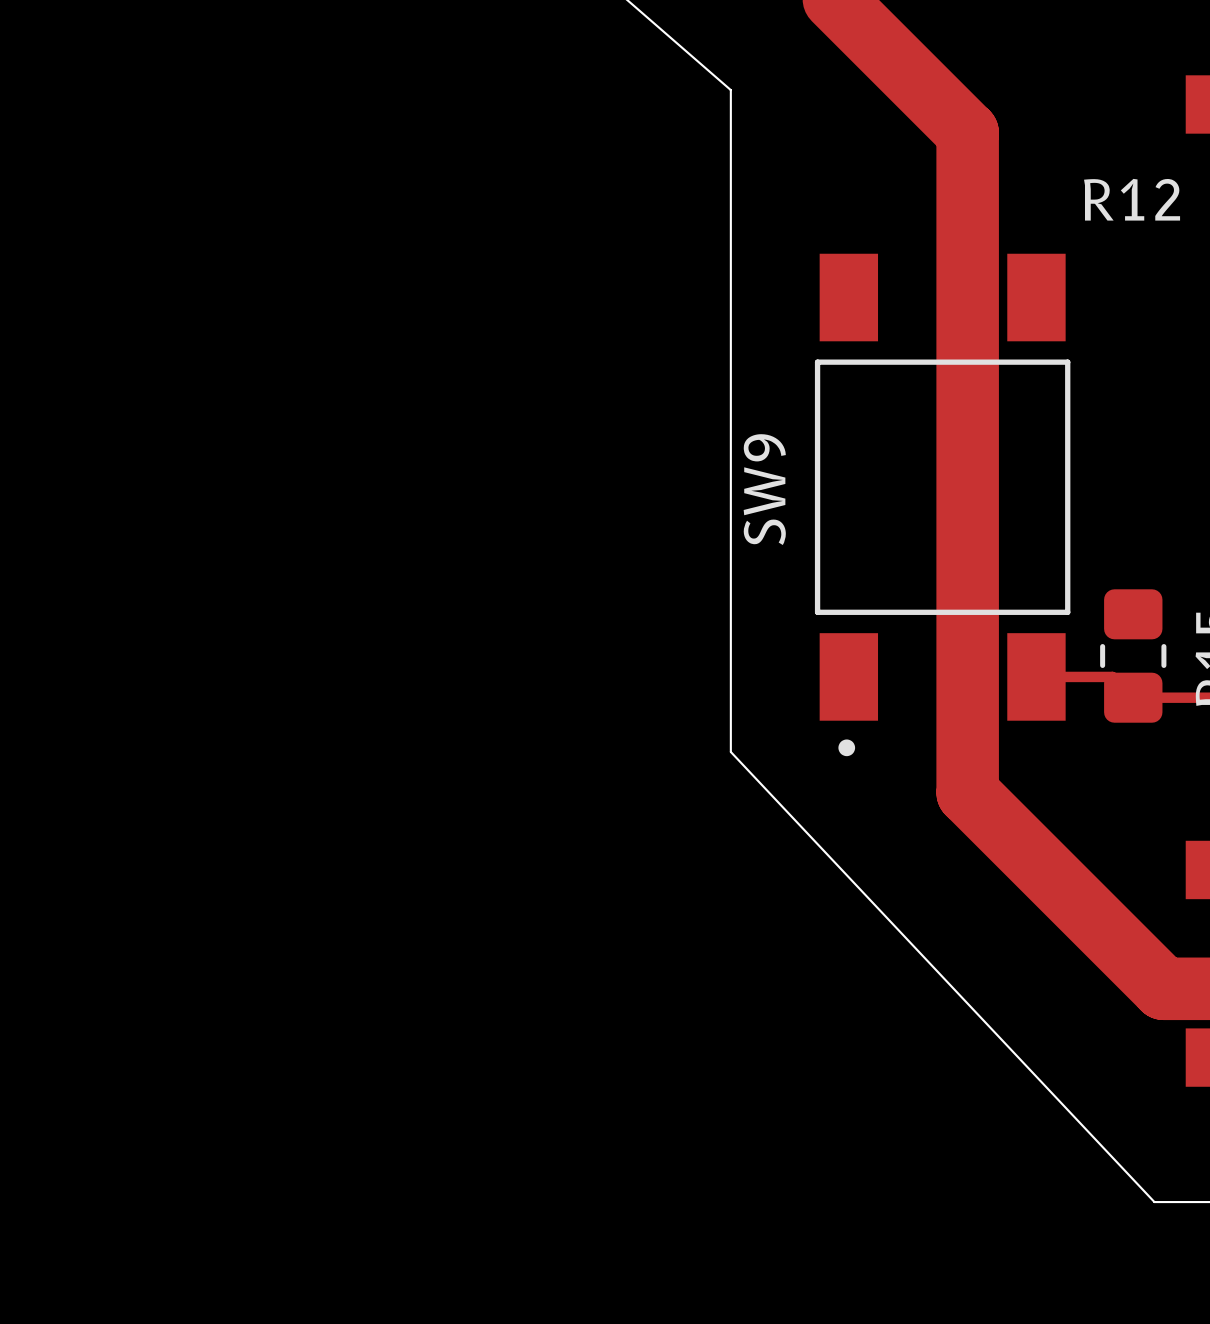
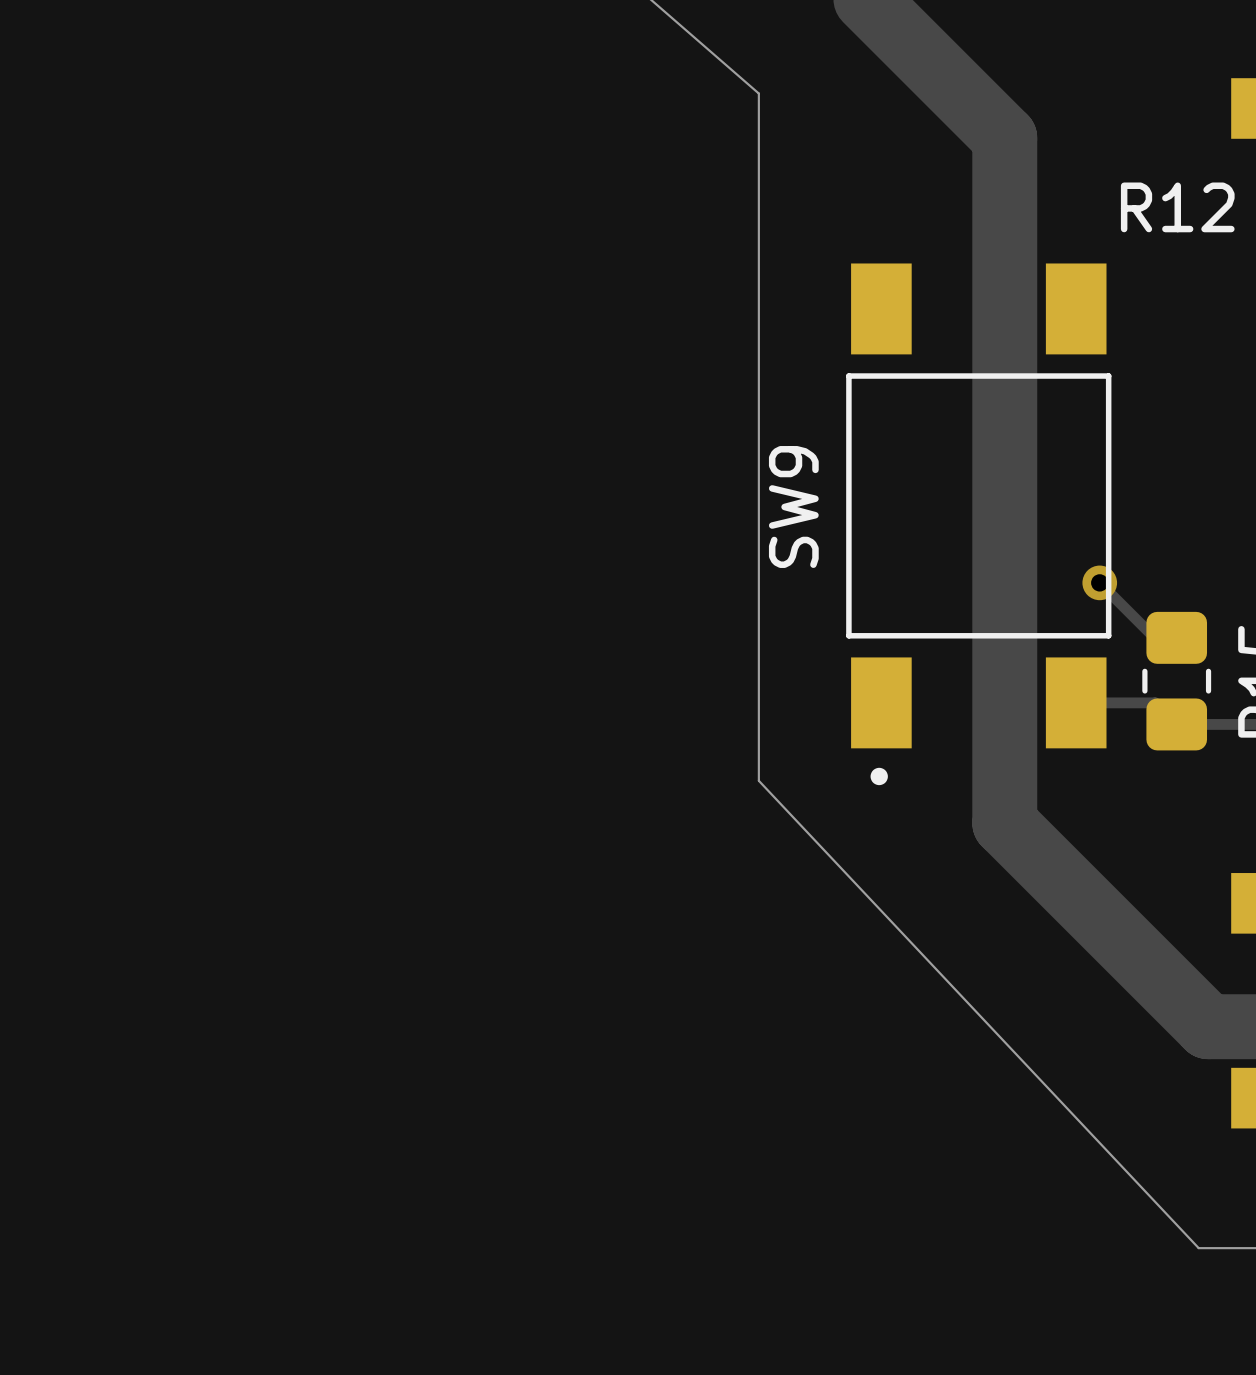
track: none -> (1099, 582) (1154, 637) (1176, 637)
via: none -> (1099, 582)

